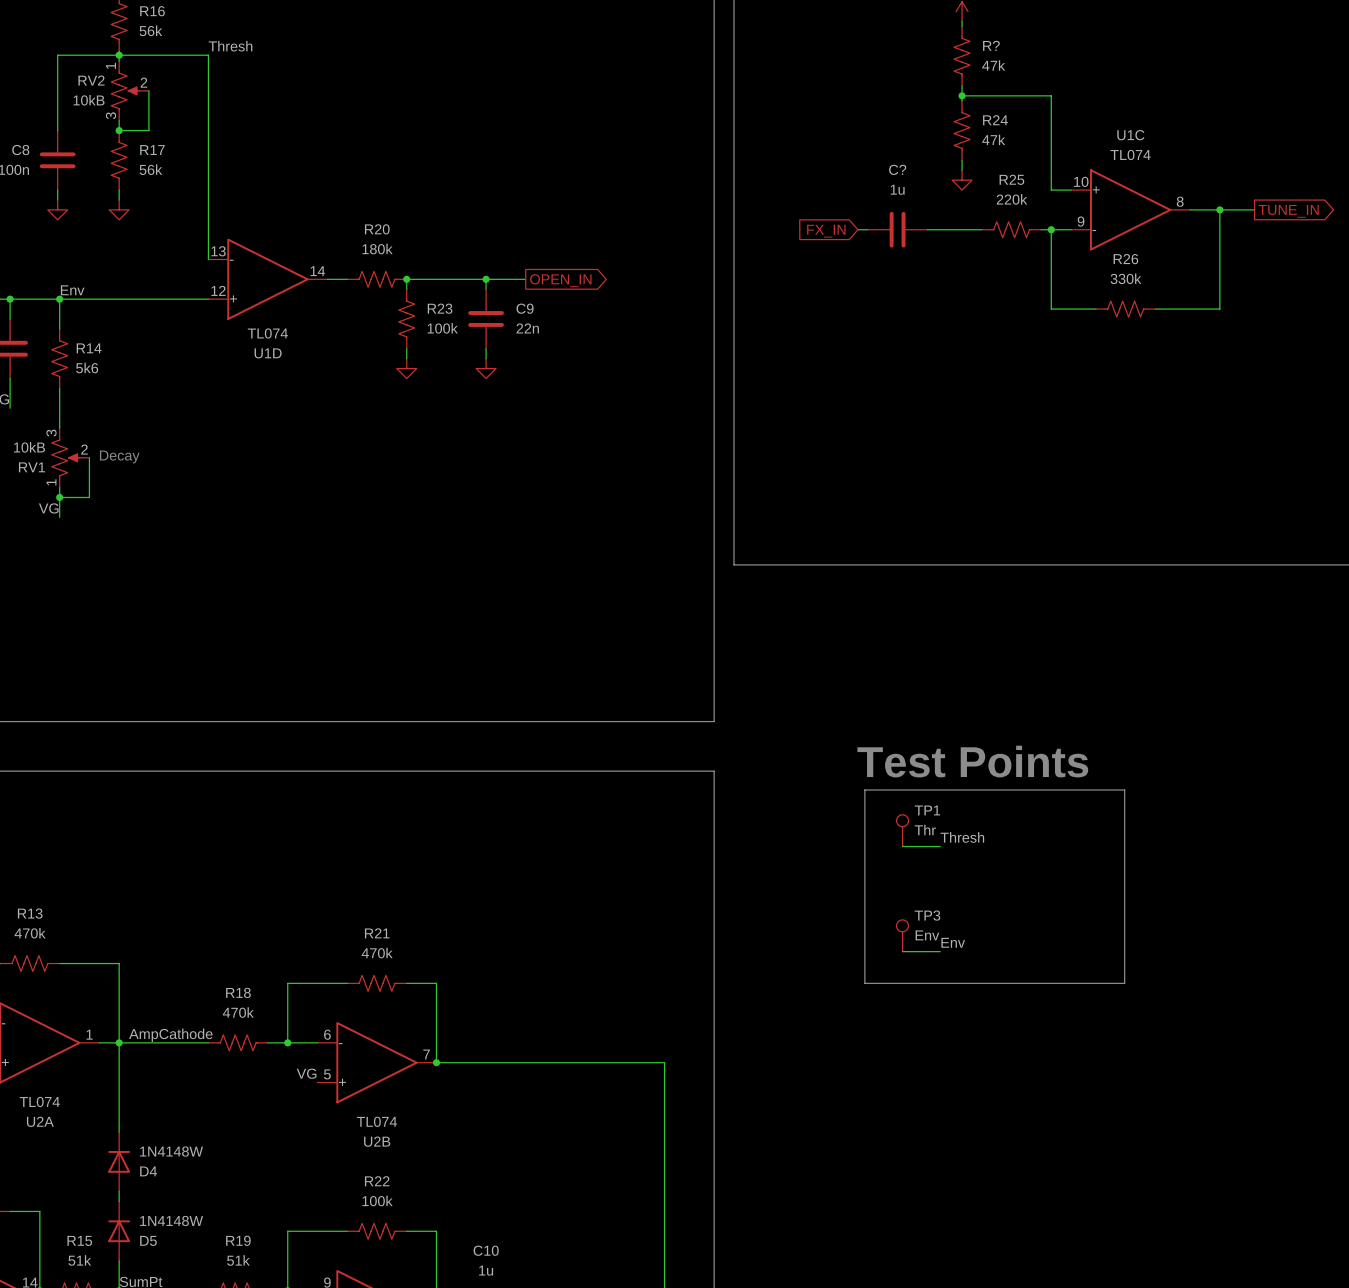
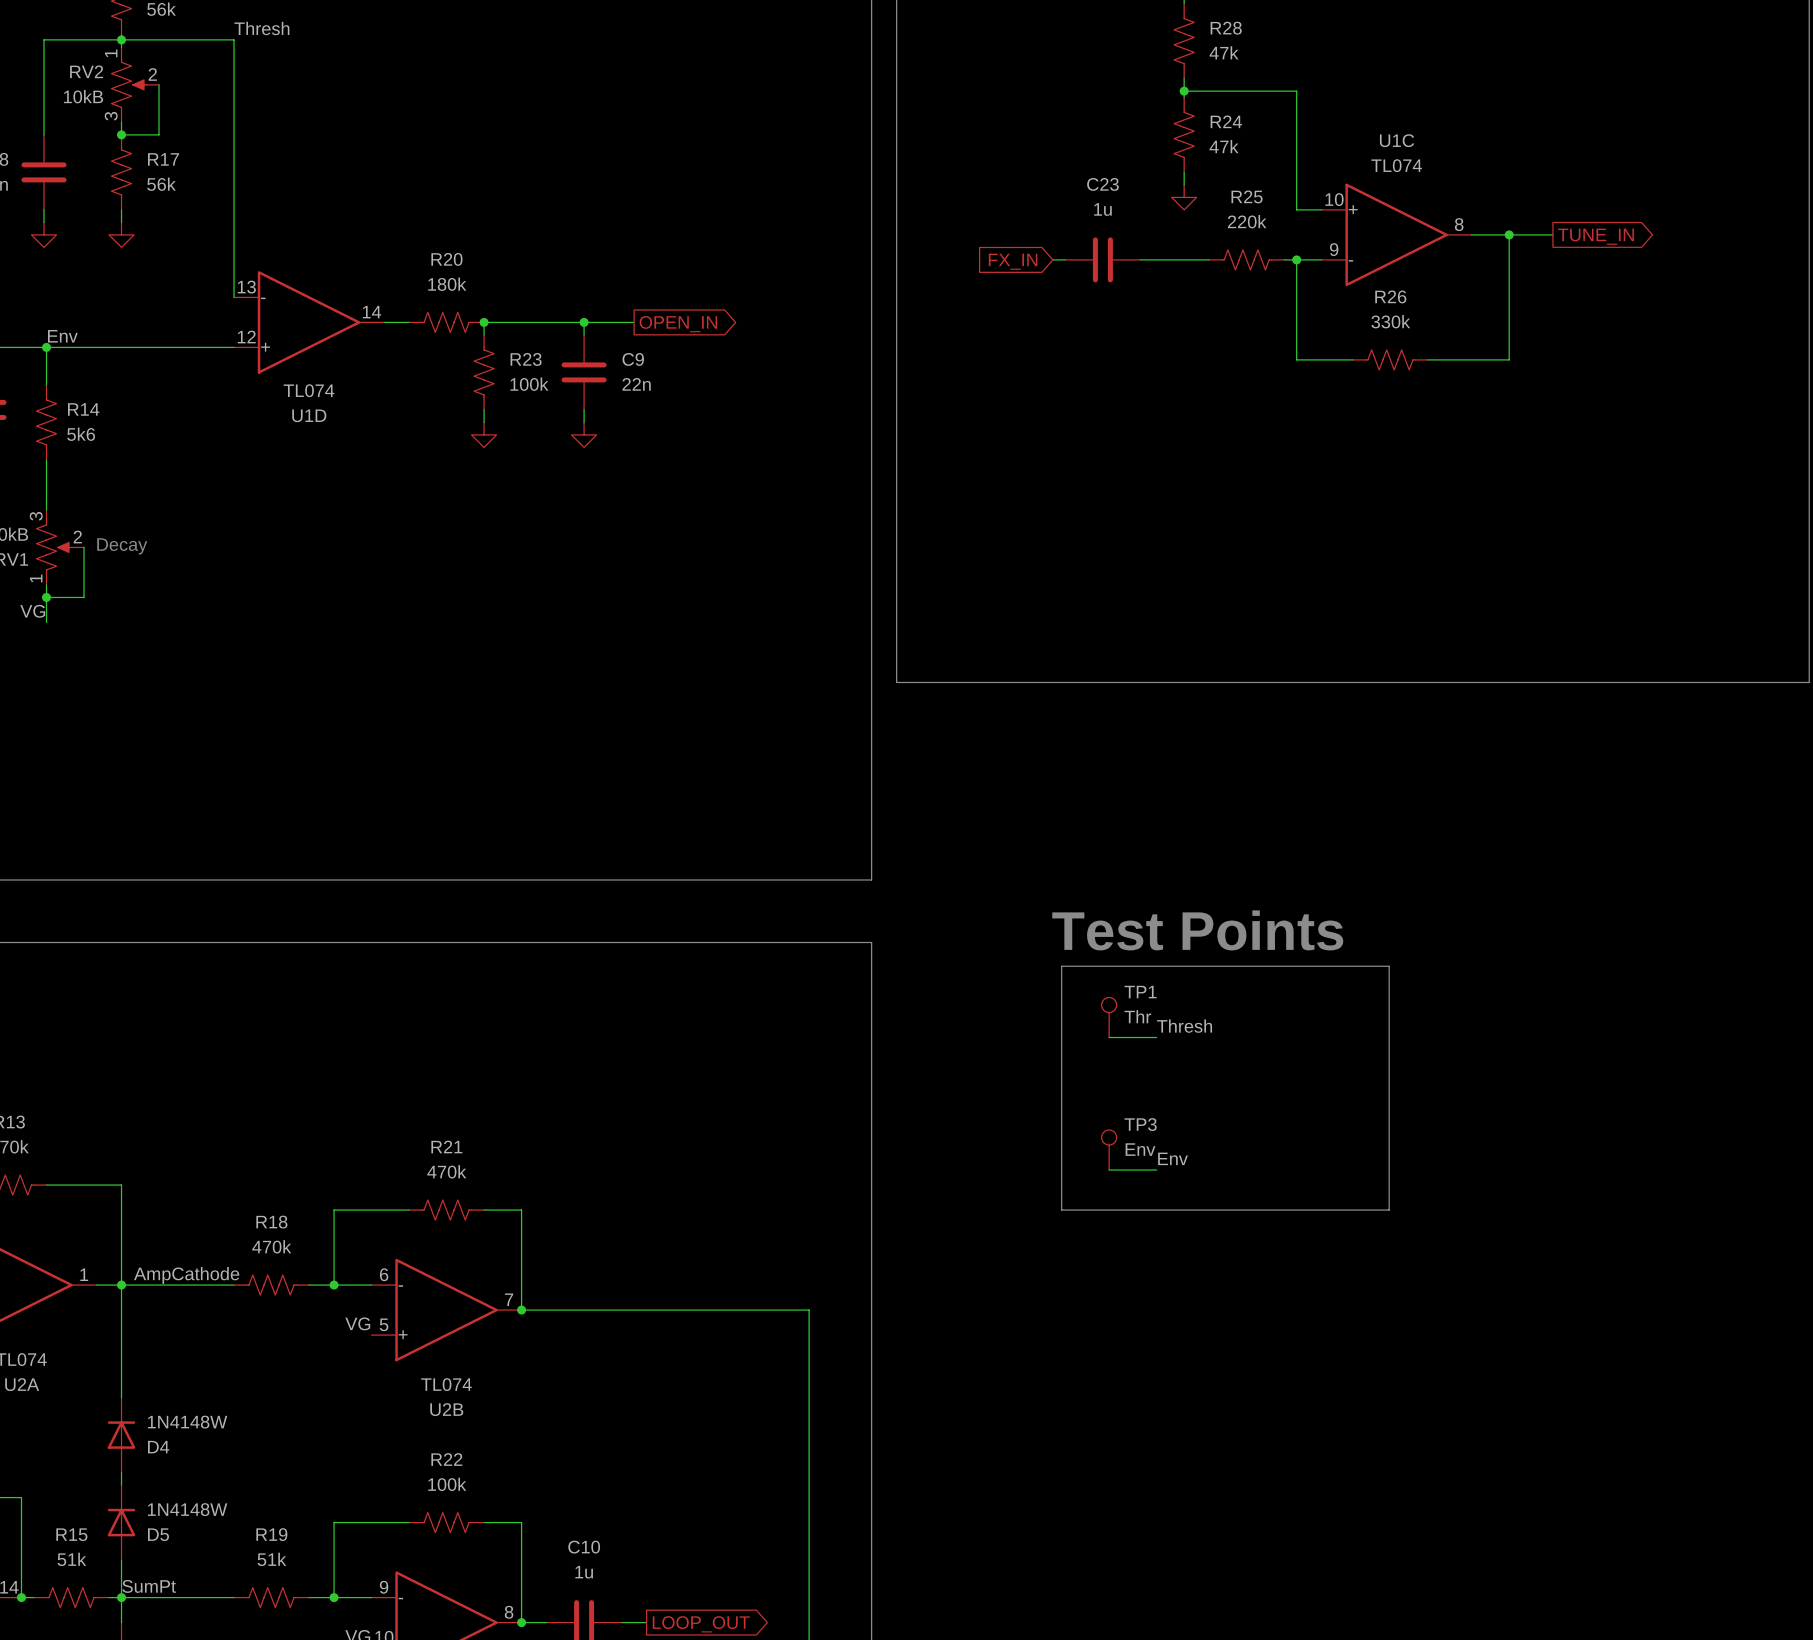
R? name: R? (991, 45) -> R28 (1226, 28)
C? name: C? (897, 169) -> C23 (1102, 184)

